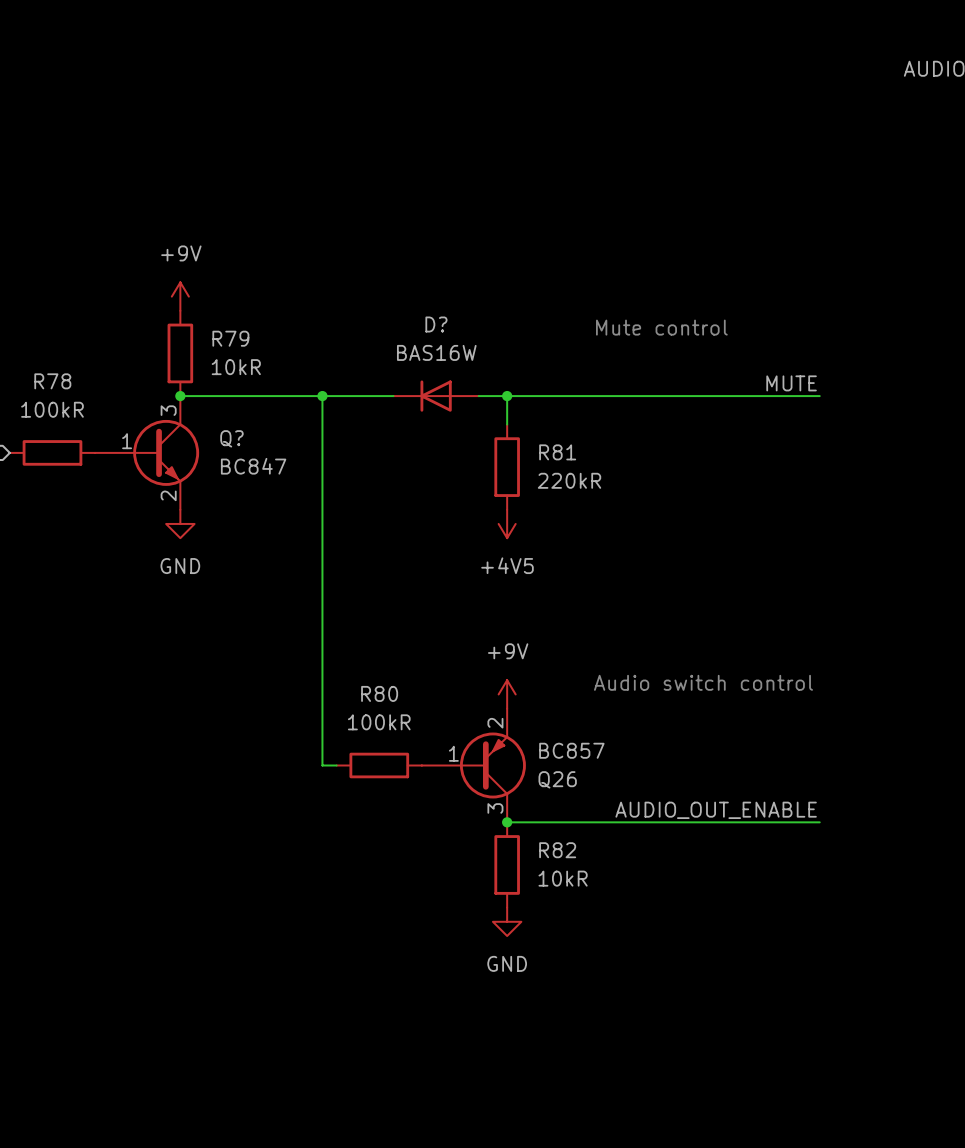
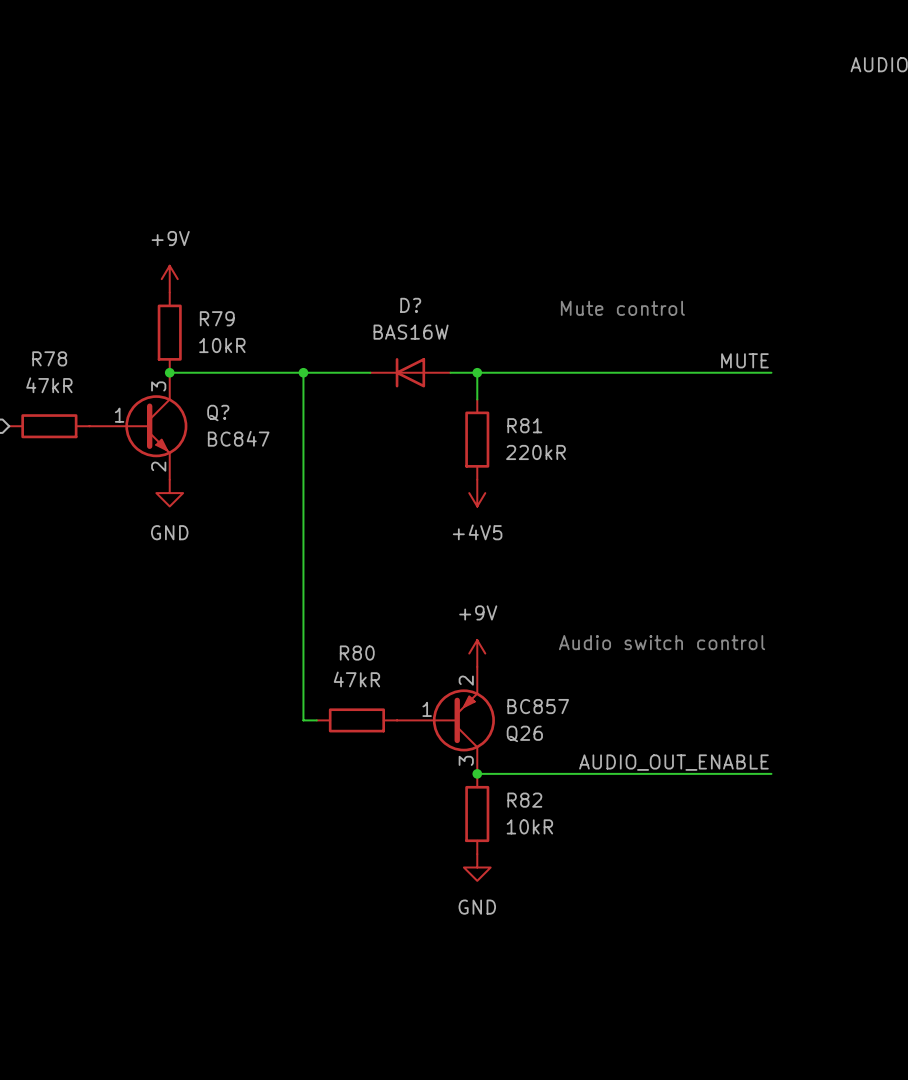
R78 value: 100kR (52, 409) -> 47kR (49, 385)
R80 value: 100kR (379, 722) -> 47kR (356, 679)

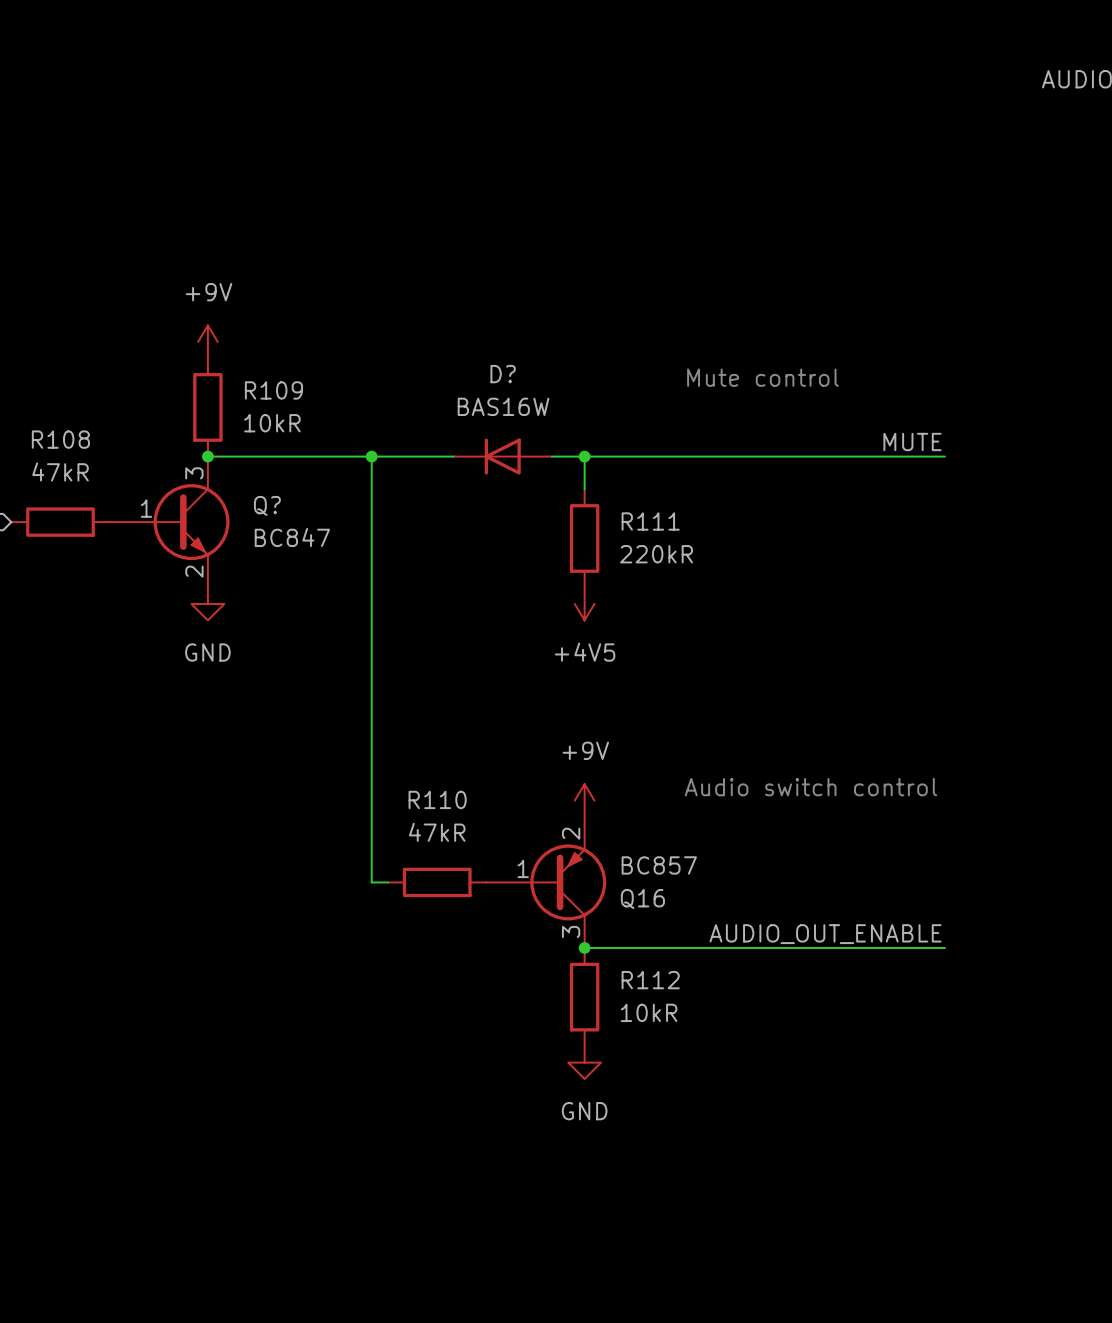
R79 name: R79 (217, 318) -> R109 (273, 390)
R78 name: R78 (49, 358) -> R108 (60, 439)
R81 name: R81 (524, 425) -> R111 (650, 521)
R80 name: R80 (357, 653) -> R110 (437, 799)
Q26 name: Q26 (524, 733) -> Q16 (642, 899)
R82 name: R82 (524, 800) -> R112 (650, 980)

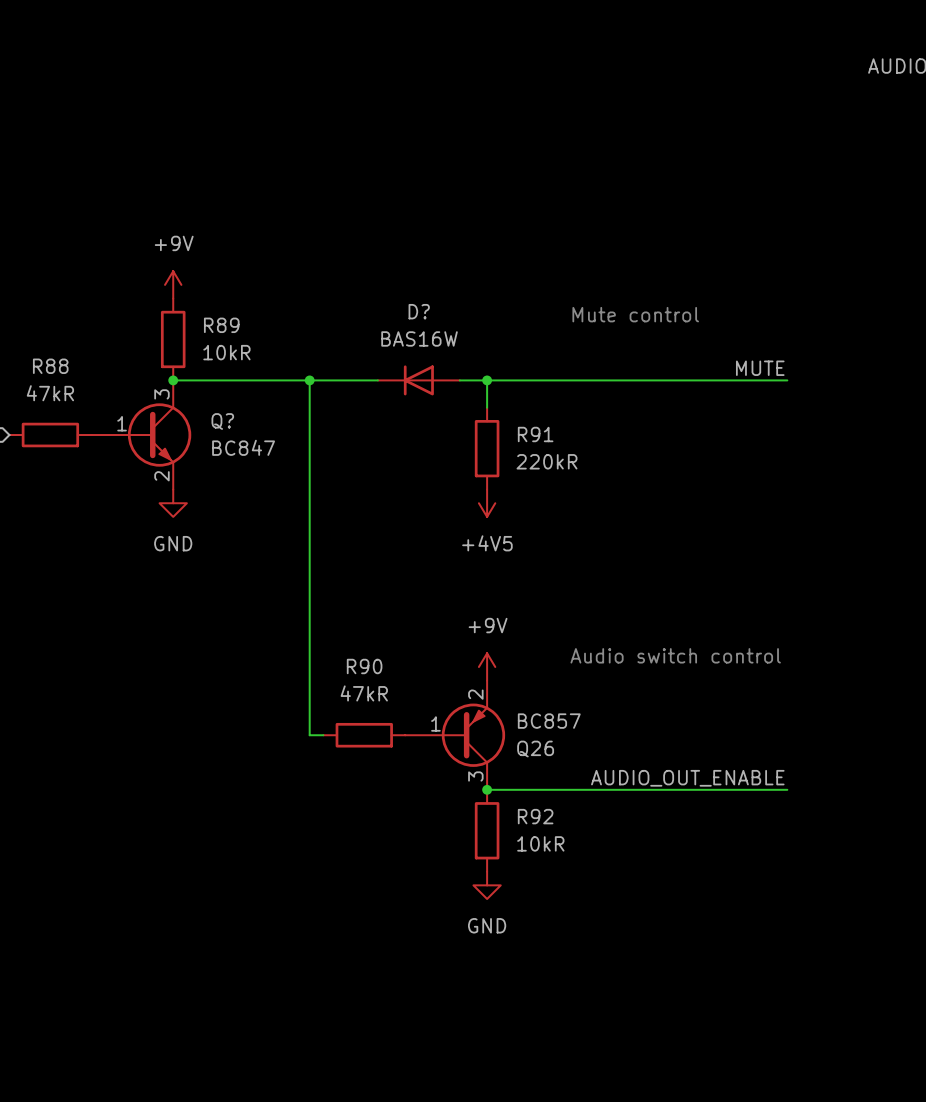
R109 name: R109 (273, 390) -> R89 (221, 325)
R108 name: R108 (60, 439) -> R88 (50, 366)
R111 name: R111 (650, 521) -> R91 (535, 434)
R110 name: R110 (437, 799) -> R90 (364, 666)
Q16 name: Q16 (642, 899) -> Q26 (535, 749)
R112 name: R112 (650, 980) -> R92 (535, 816)

